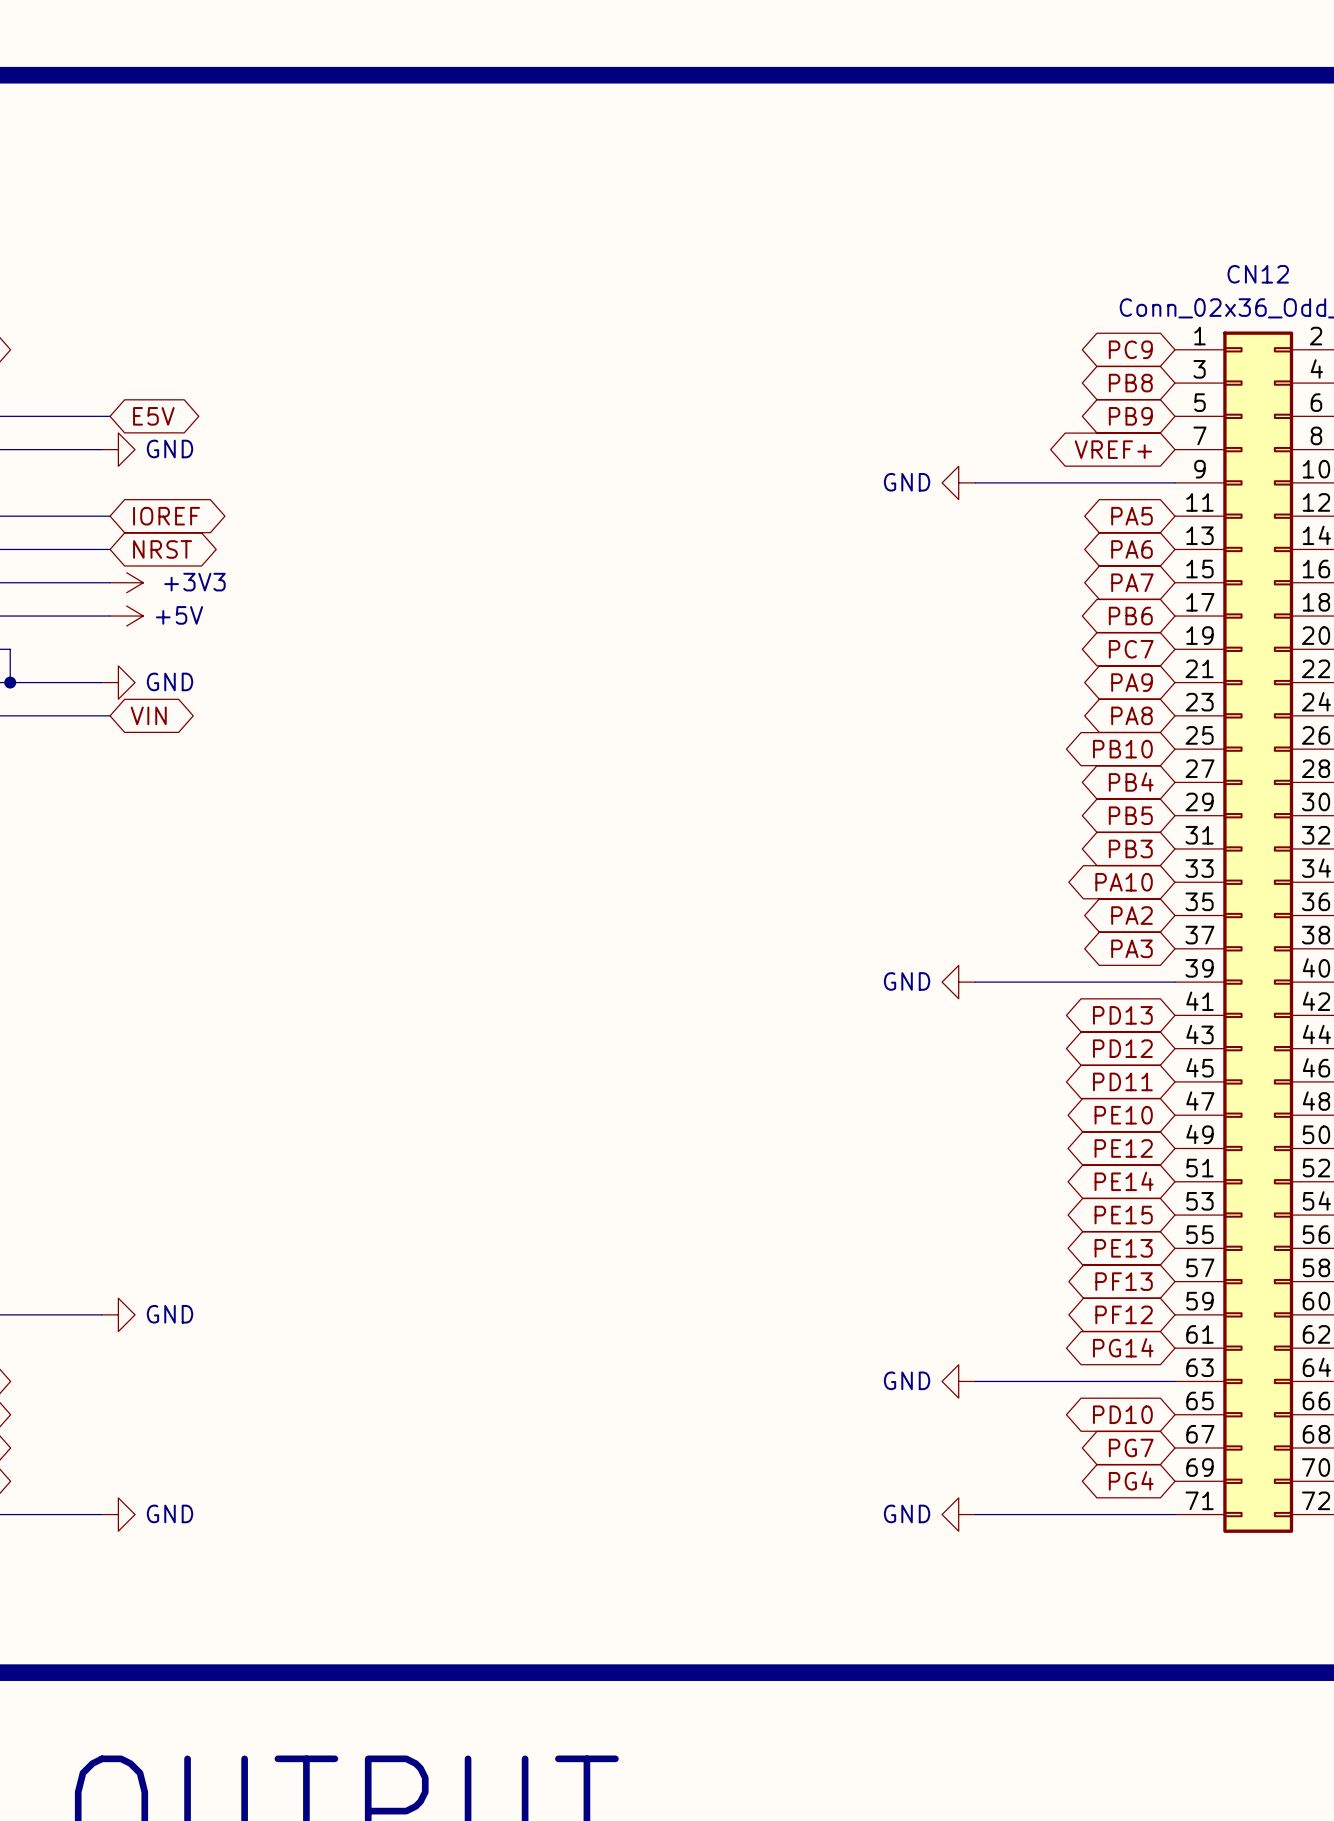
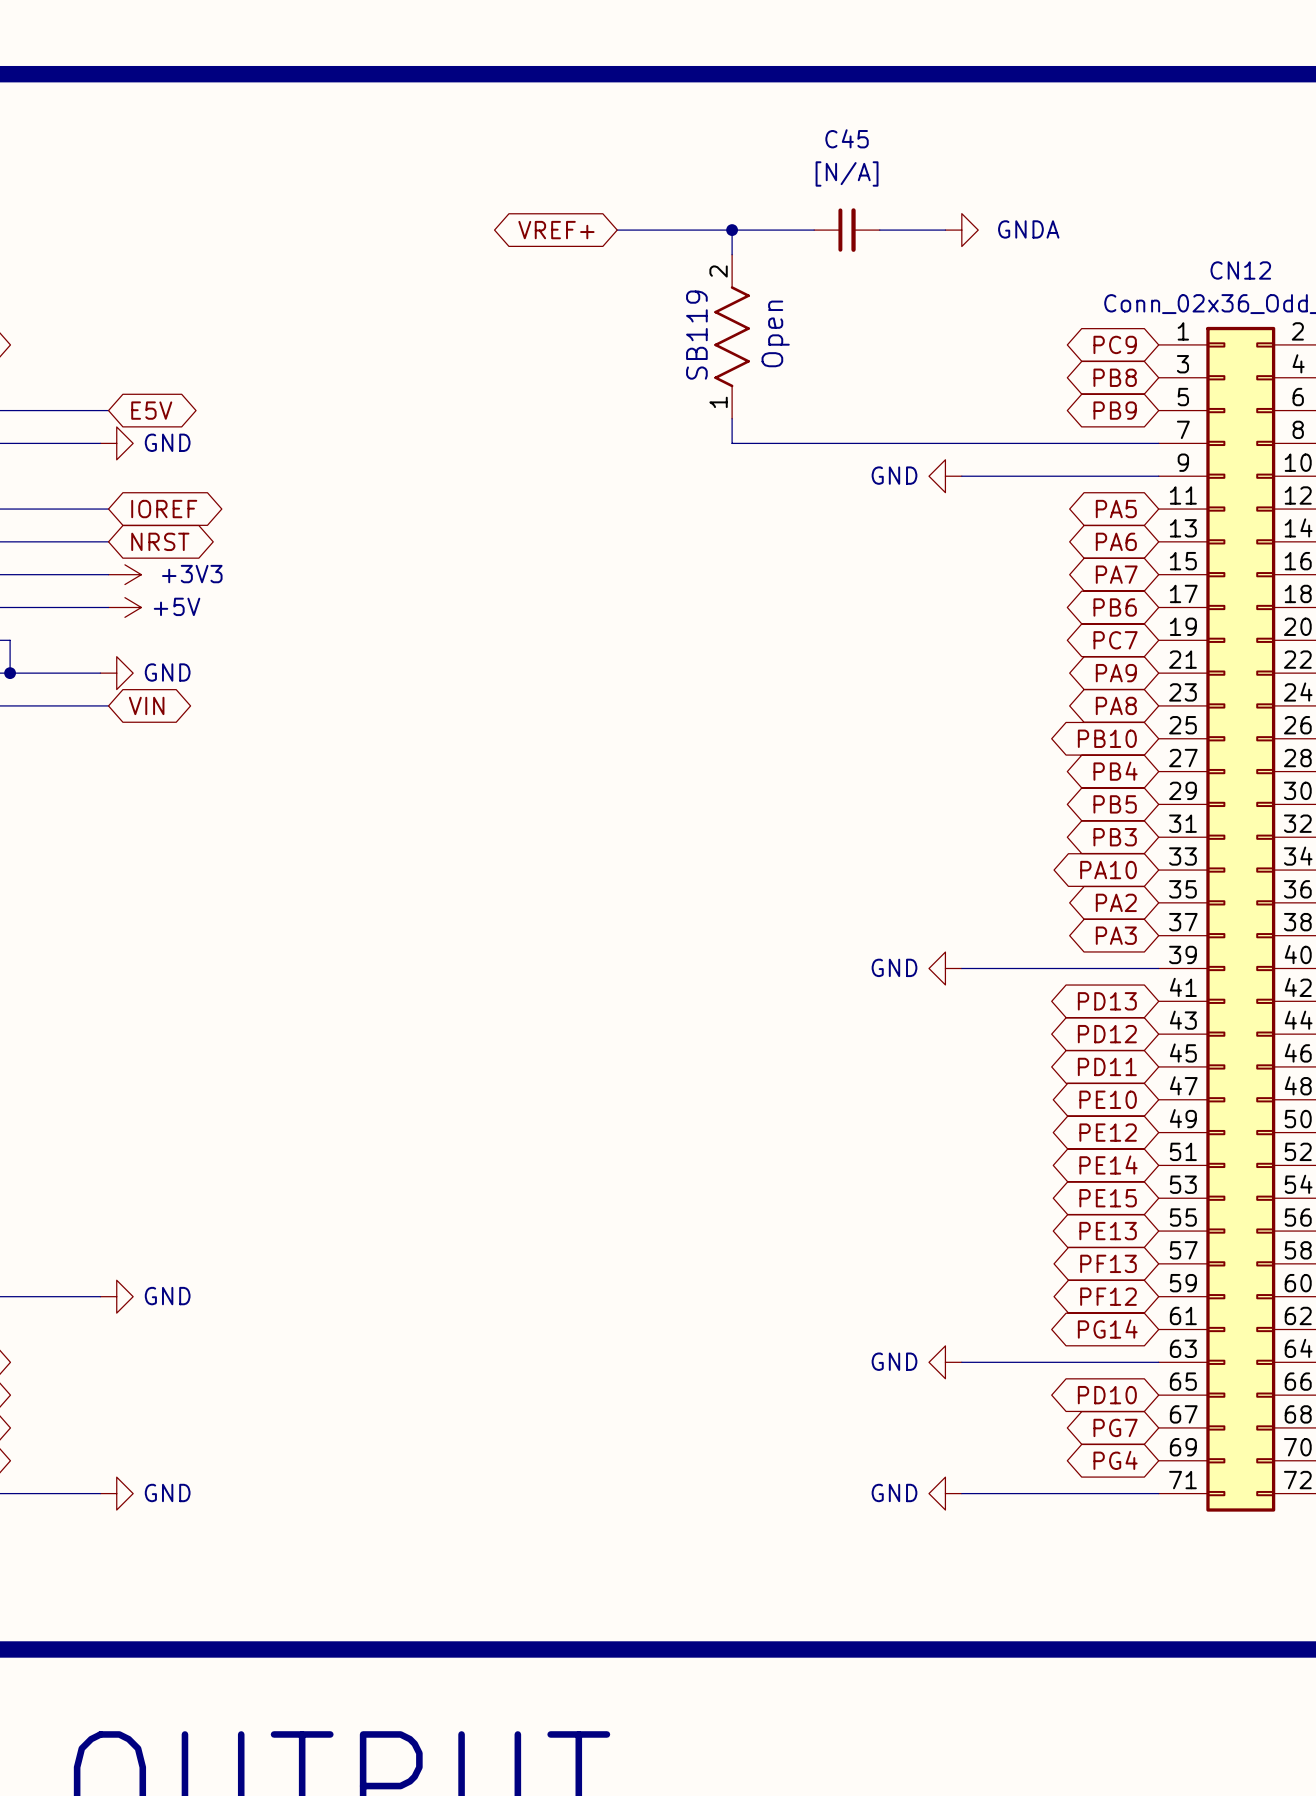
global label: none -> VREF+ (556, 230)
wire: none -> (617, 230) (814, 230)
wire: none -> (732, 230) (732, 254)
junction: none -> (732, 230)
C45: none -> [N/A] (846, 230)
wire: none -> (879, 230) (945, 230)
power symbol: none -> GNDA (961, 230)
SB119: none -> Open (732, 336)
wire: none -> (732, 418) (732, 443) (1158, 443)
global label: VREF+ (1113, 449) -> none

